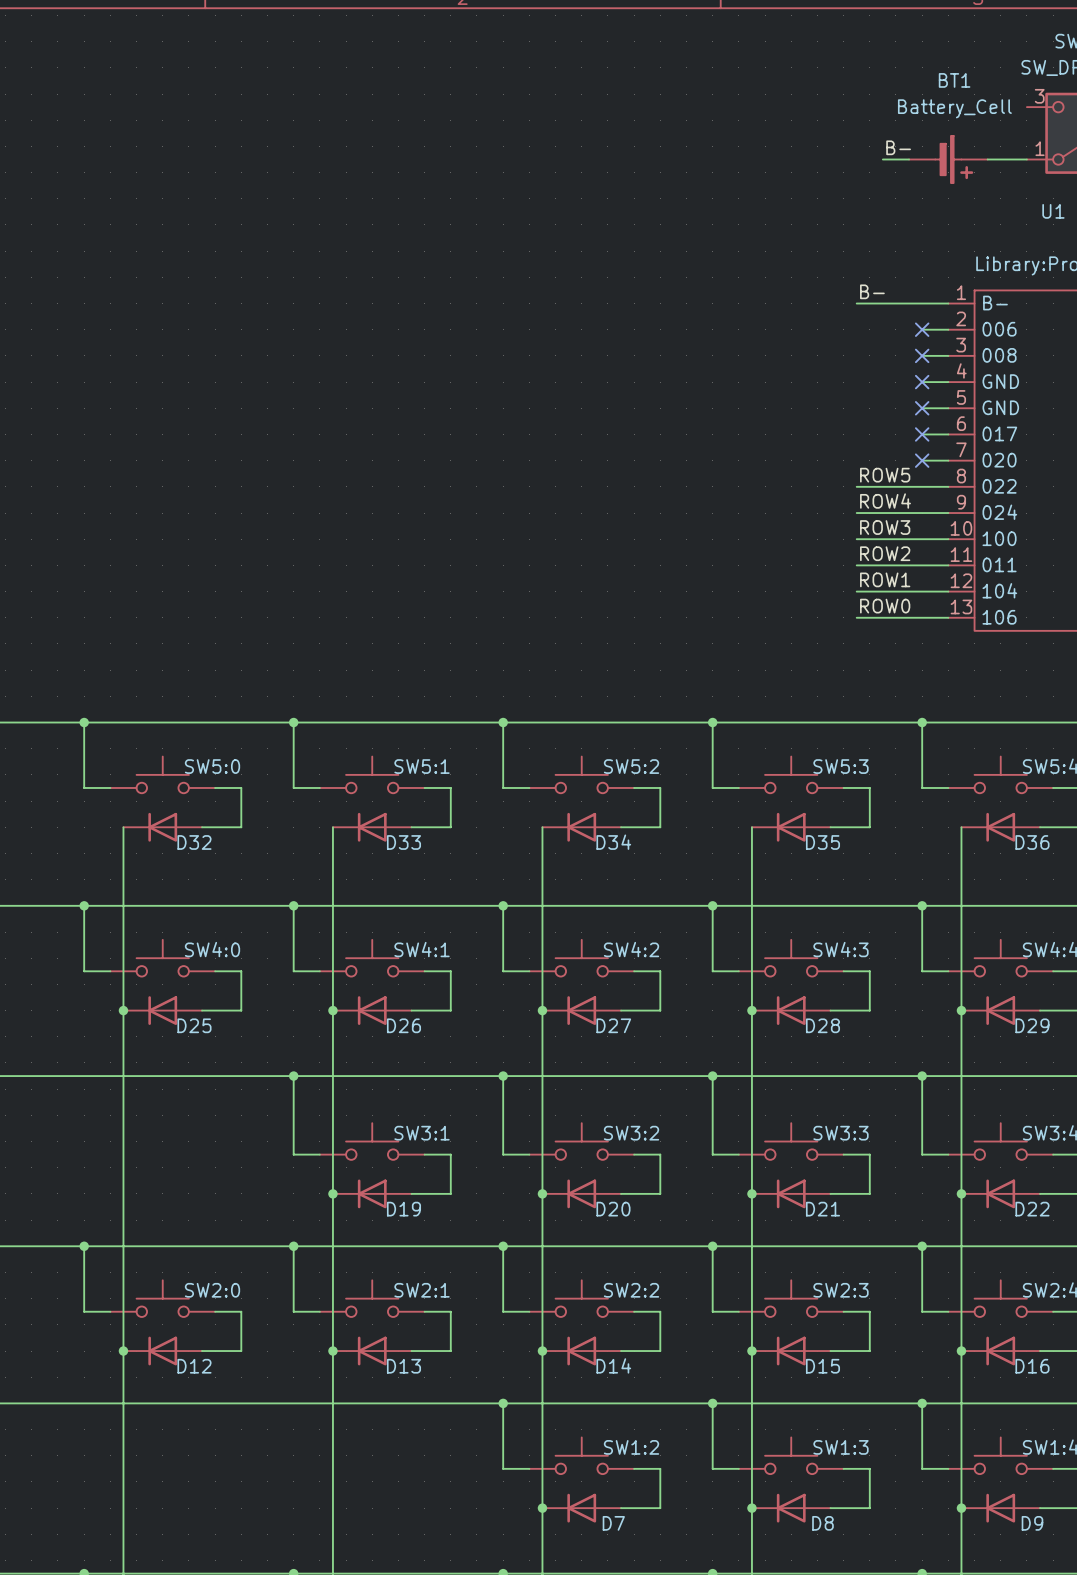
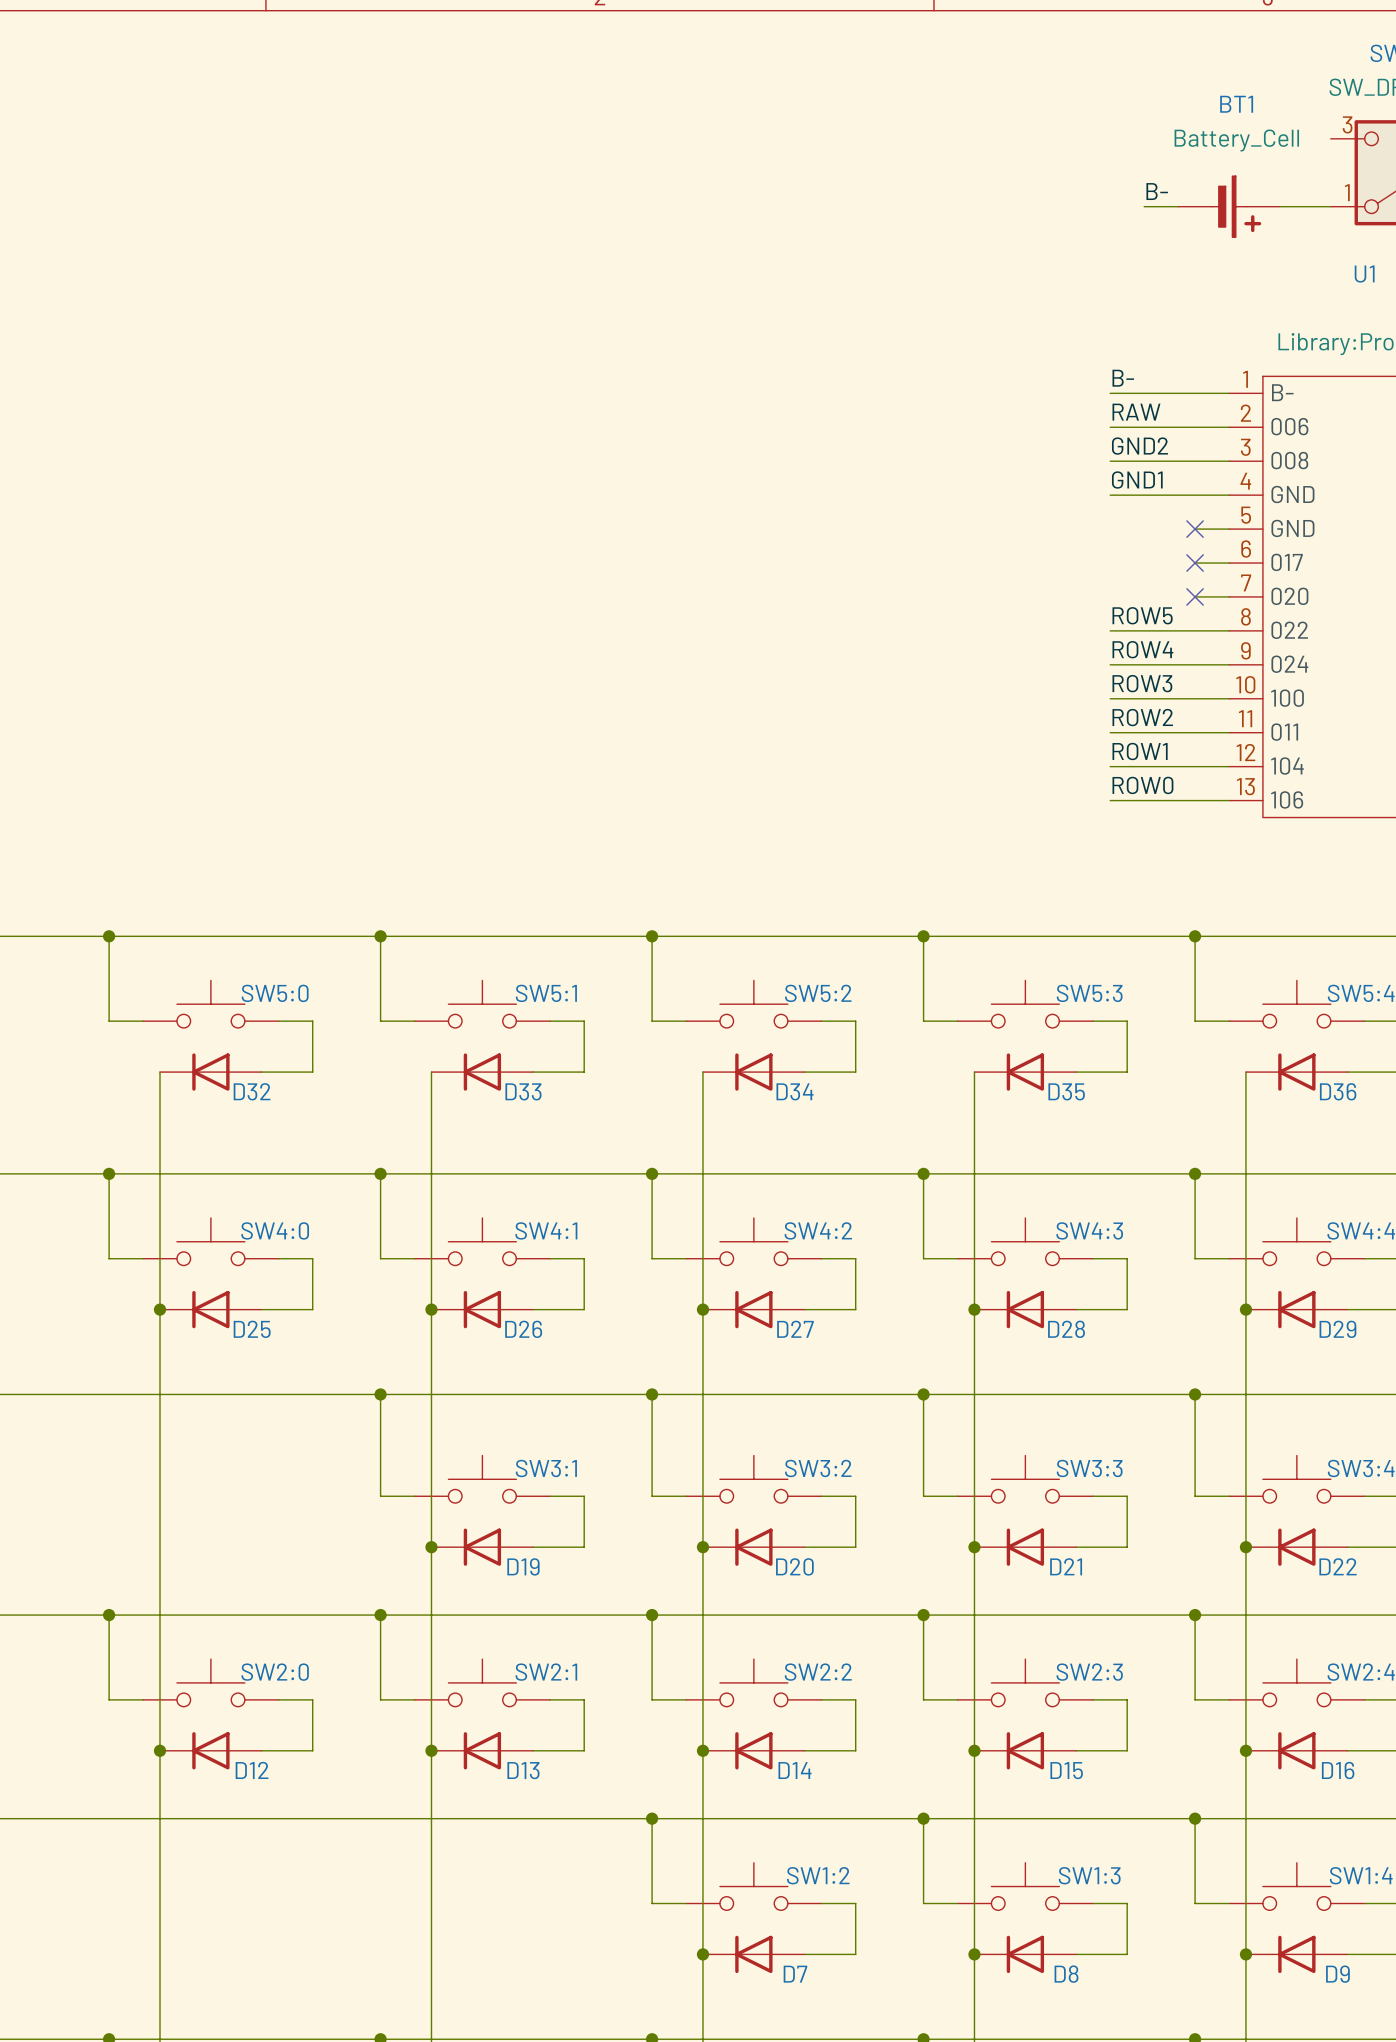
label: none -> RAW (1136, 412)
wire: none -> (1110, 427) (1195, 427)
no-connect mark: (922, 329) -> none
label: none -> GND2 (1140, 446)
wire: none -> (1110, 461) (1195, 461)
no-connect mark: (922, 355) -> none
label: none -> GND1 (1137, 480)
wire: none -> (1110, 495) (1195, 495)
no-connect mark: (922, 382) -> none

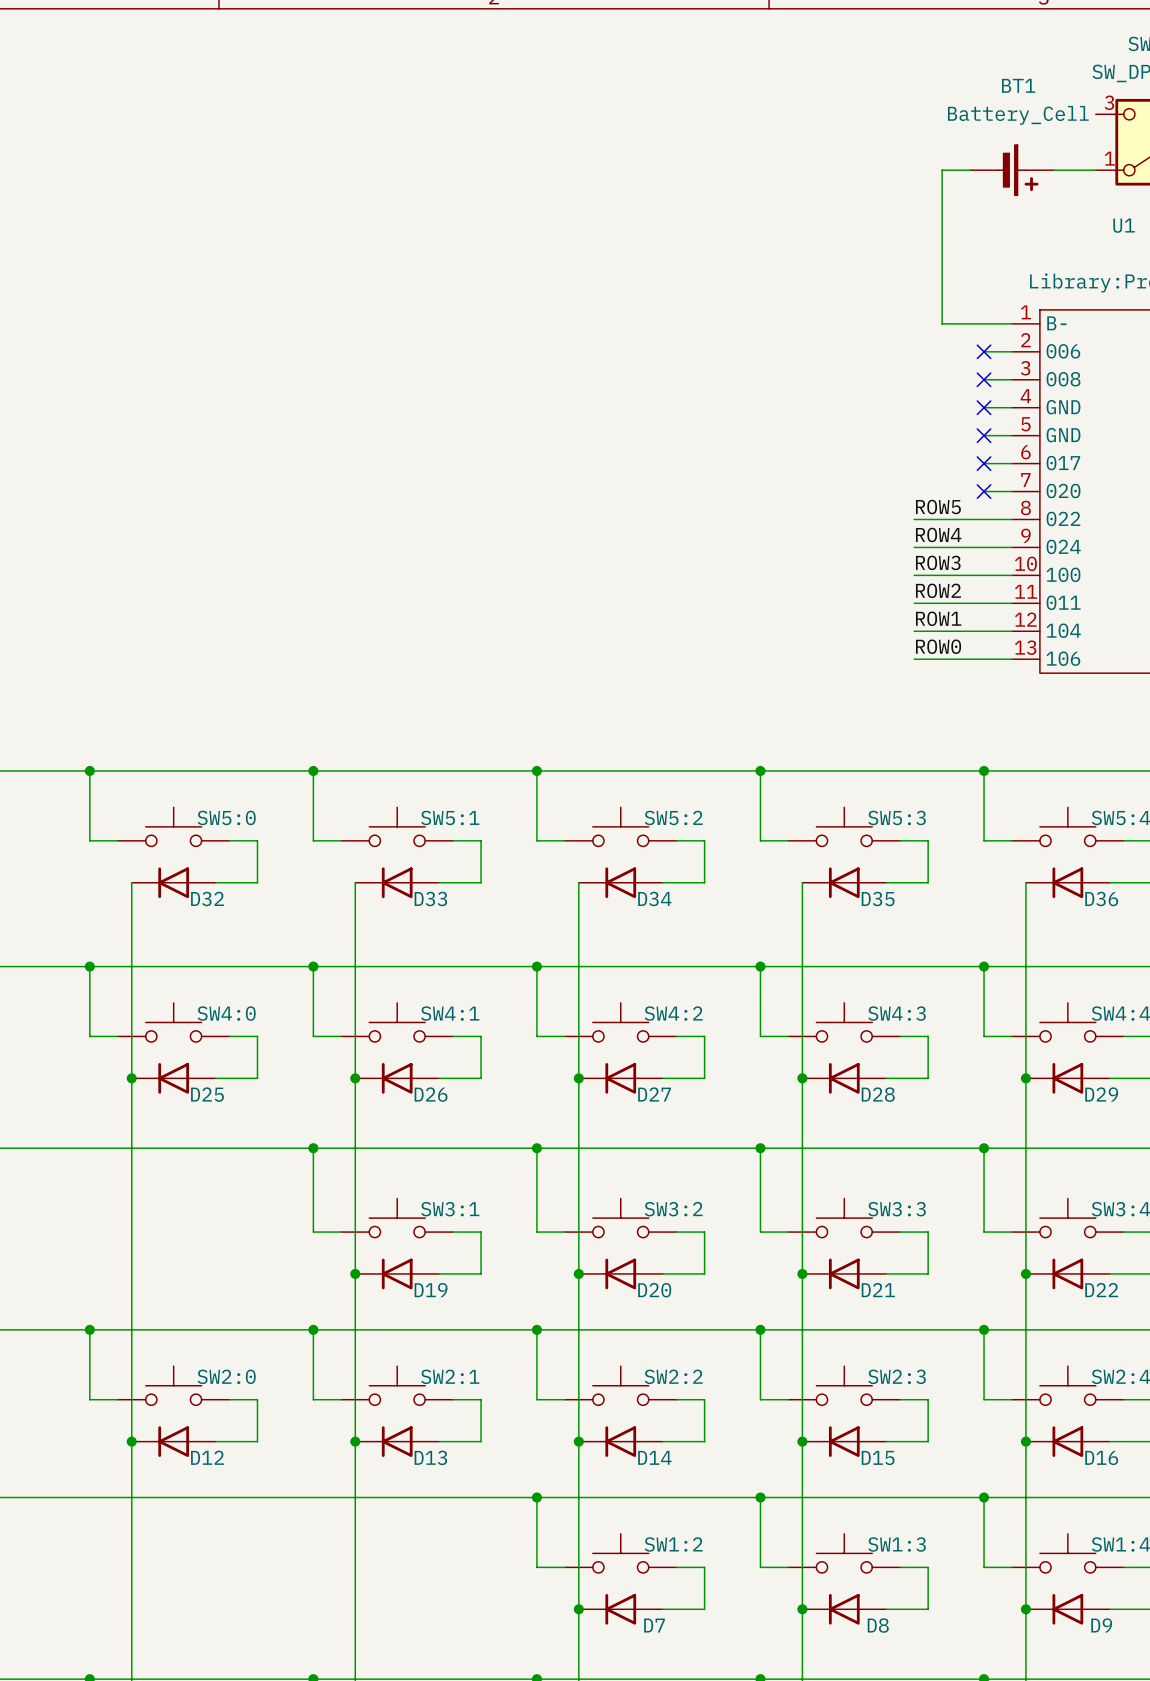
label: B- (1157, 191) -> none
label: B- (1123, 378) -> none
wire: (1110, 393) (1144, 393) -> (942, 170) (942, 323)
label: RAW (1136, 412) -> none
wire: (1110, 427) (1195, 427) -> none
no-connect mark: none -> (984, 351)
label: GND2 (1140, 446) -> none
wire: (1110, 461) (1195, 461) -> none
no-connect mark: none -> (984, 379)
label: GND1 (1137, 480) -> none
wire: (1110, 495) (1195, 495) -> none
no-connect mark: none -> (984, 407)

